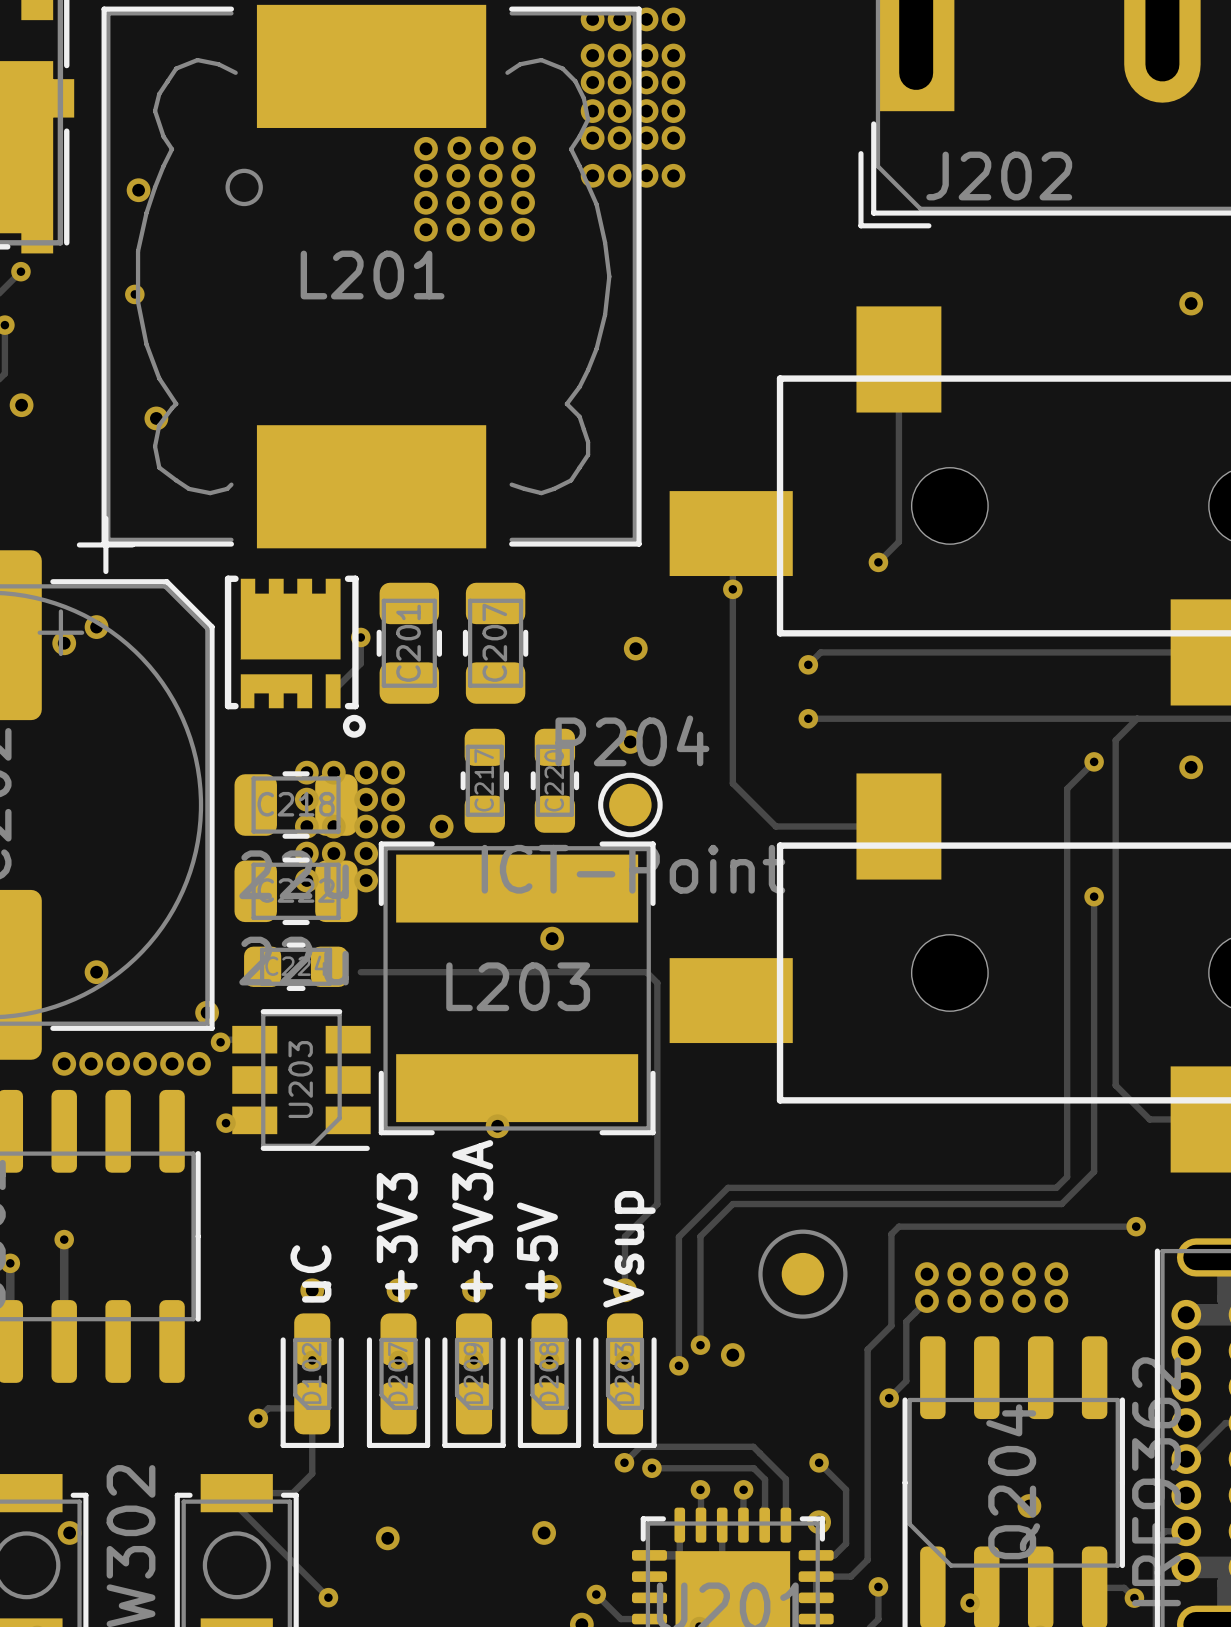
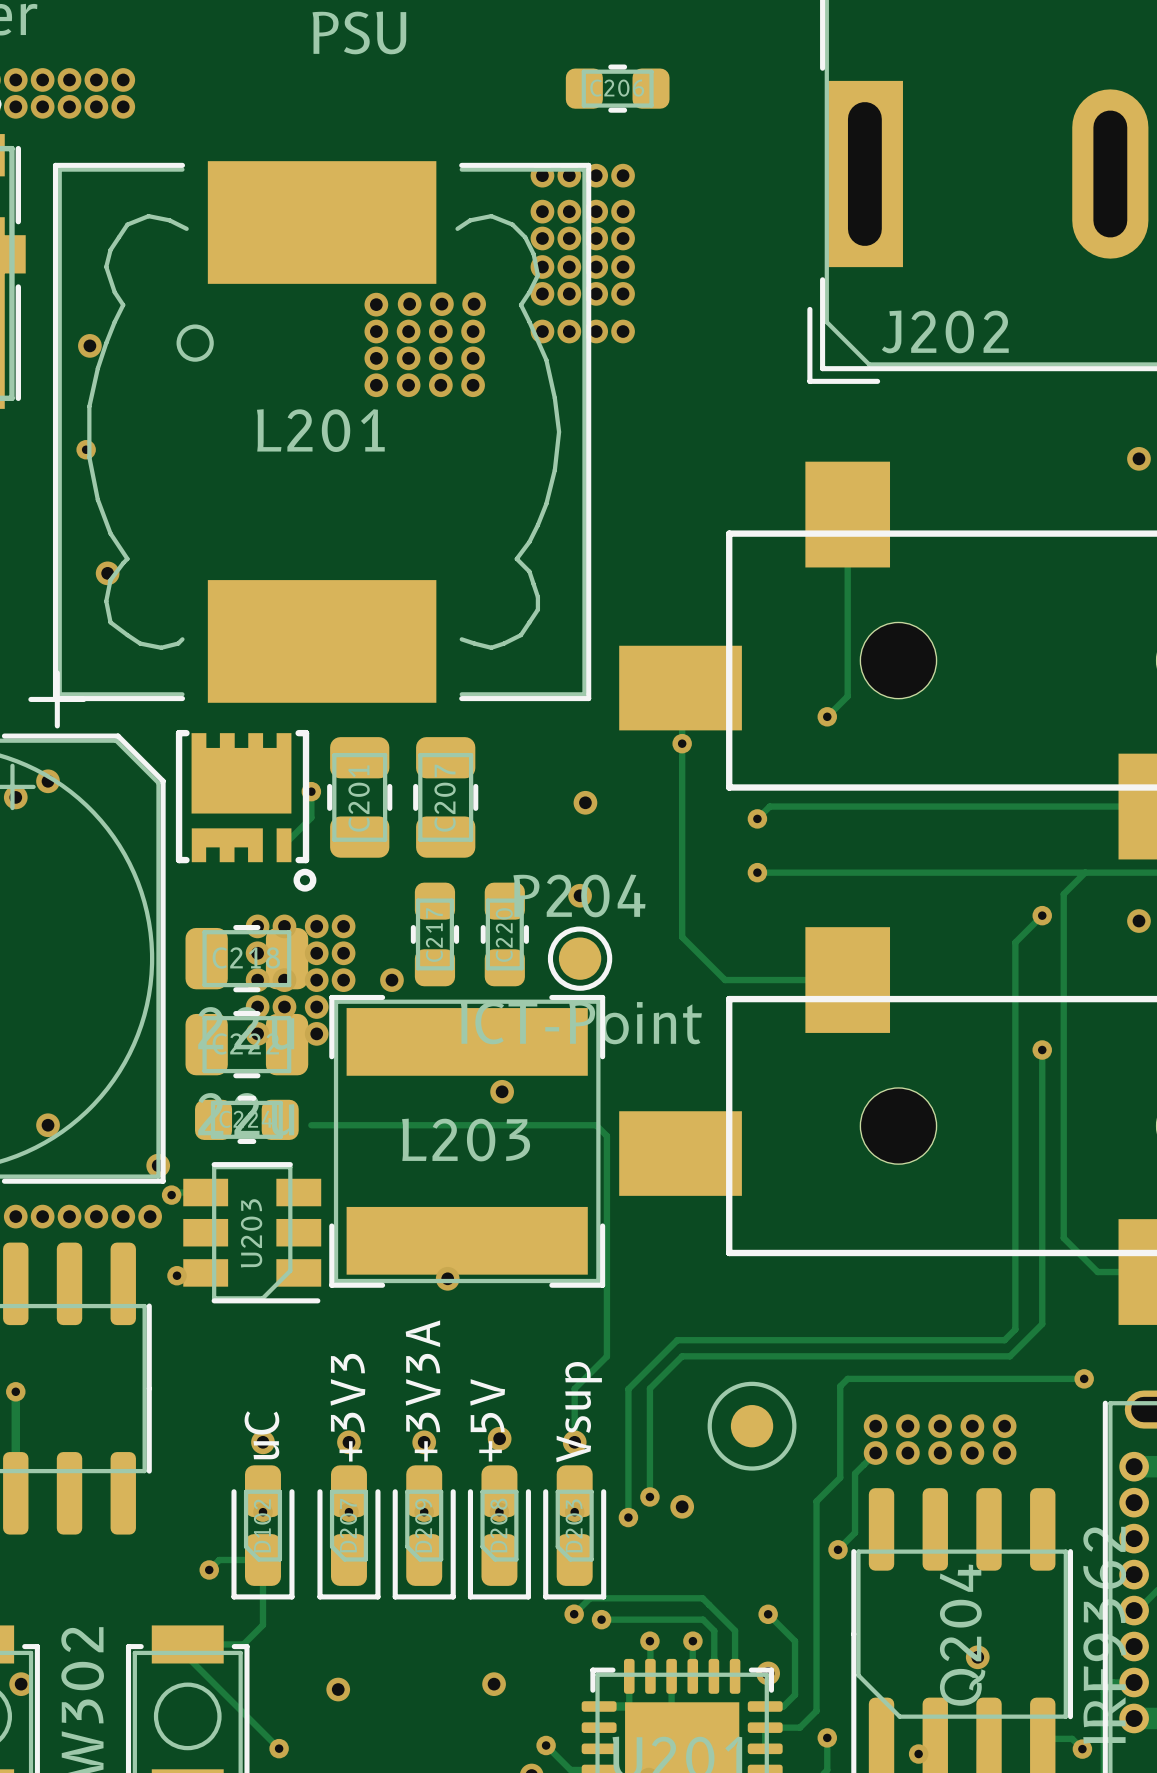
part footprint: [224, 575, 366, 738] -> [175, 729, 317, 892]

